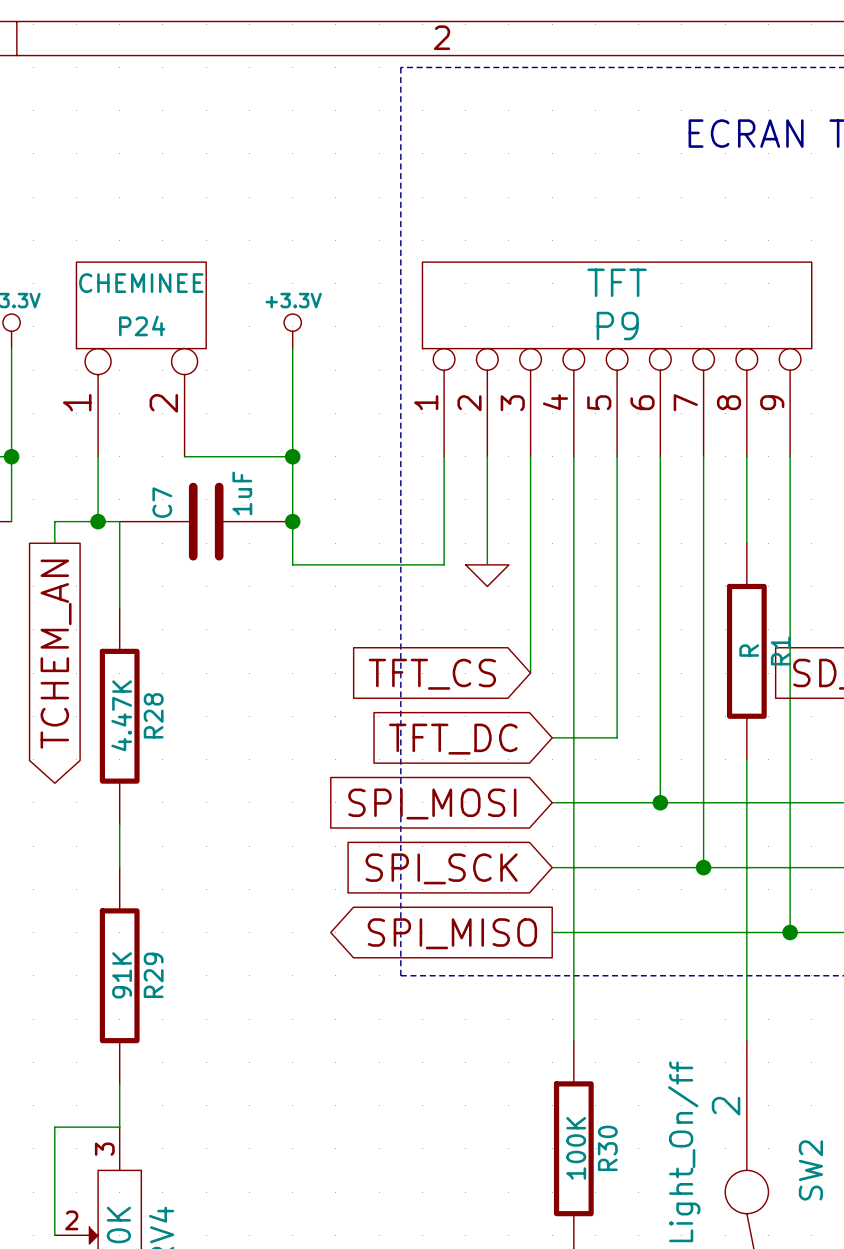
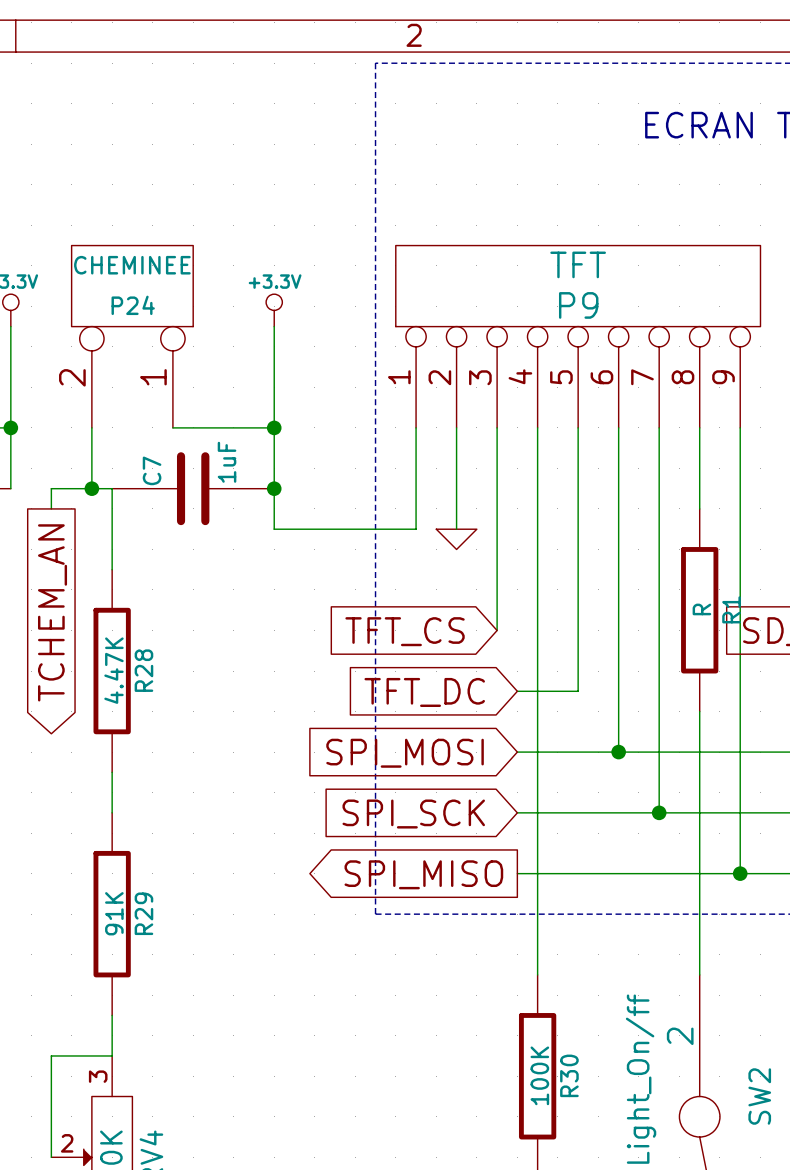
P24 flip: as is (141, 305) -> left-right (132, 286)

